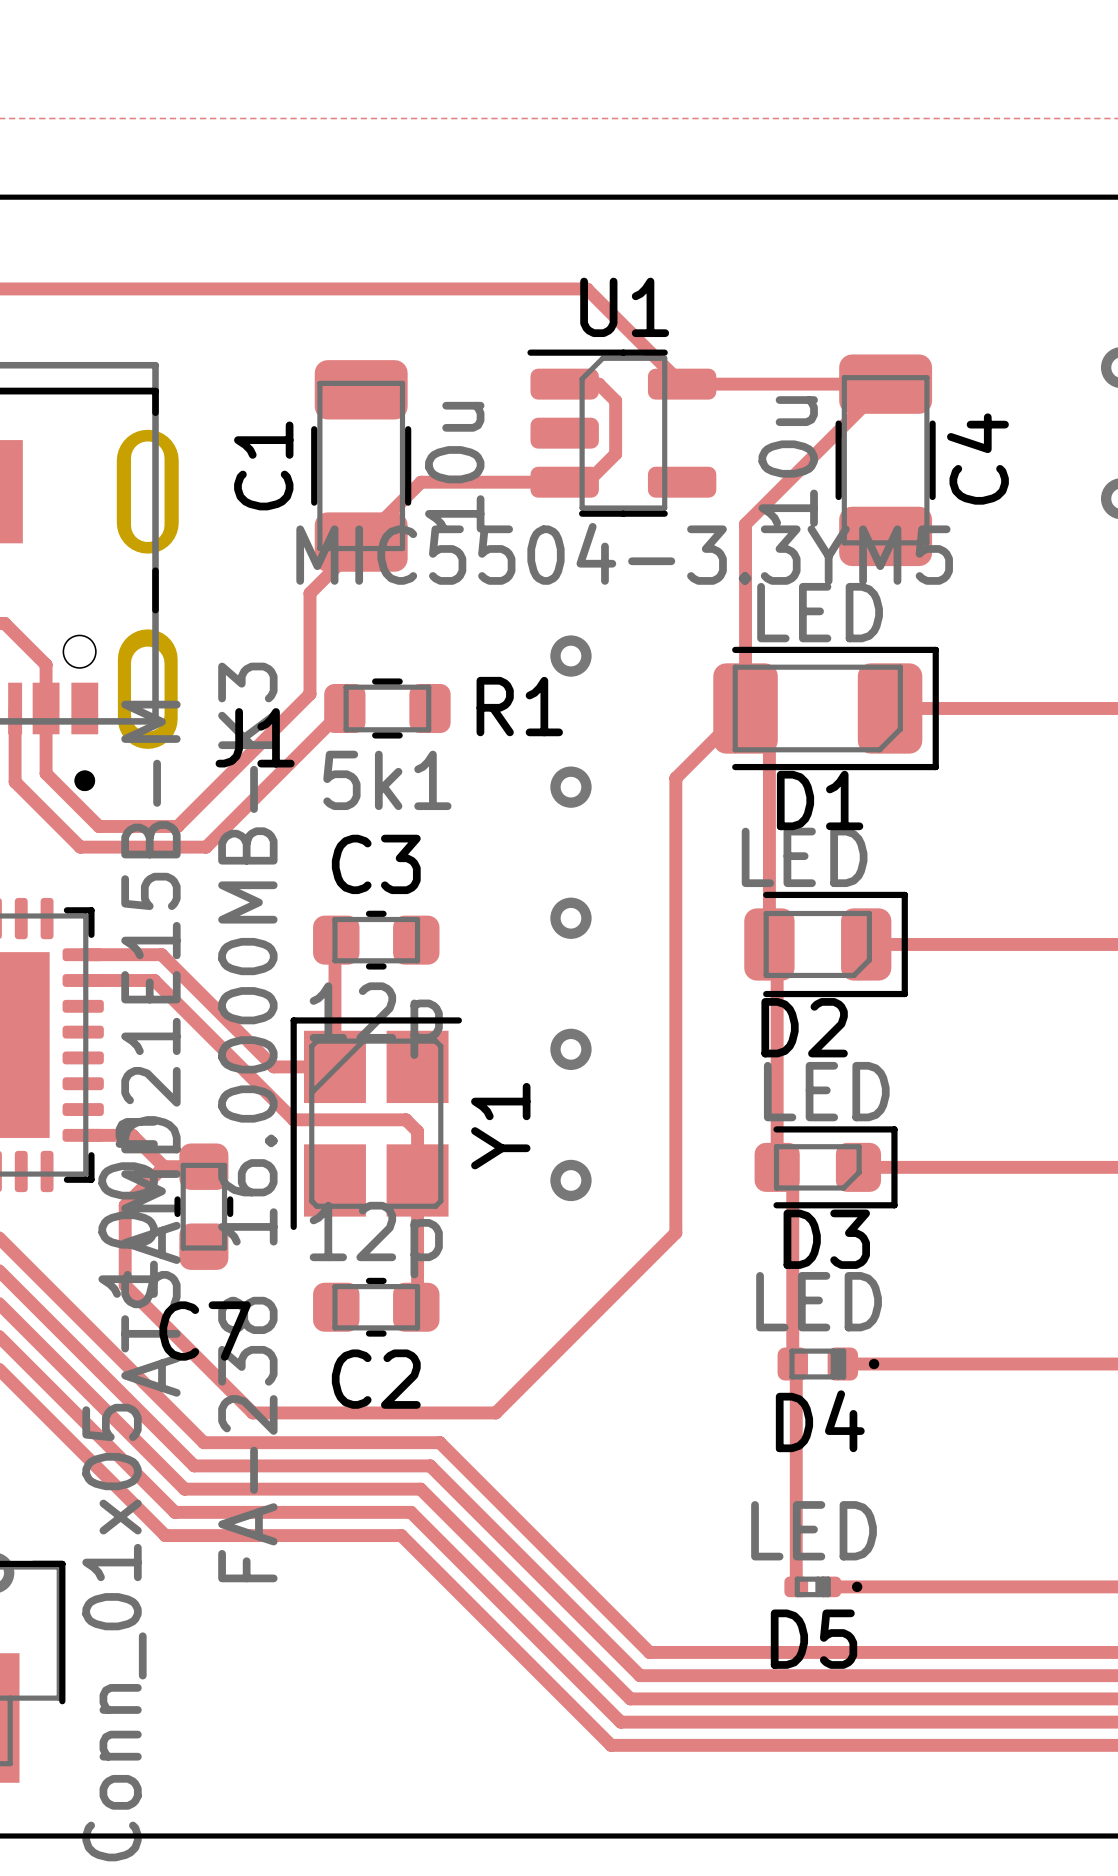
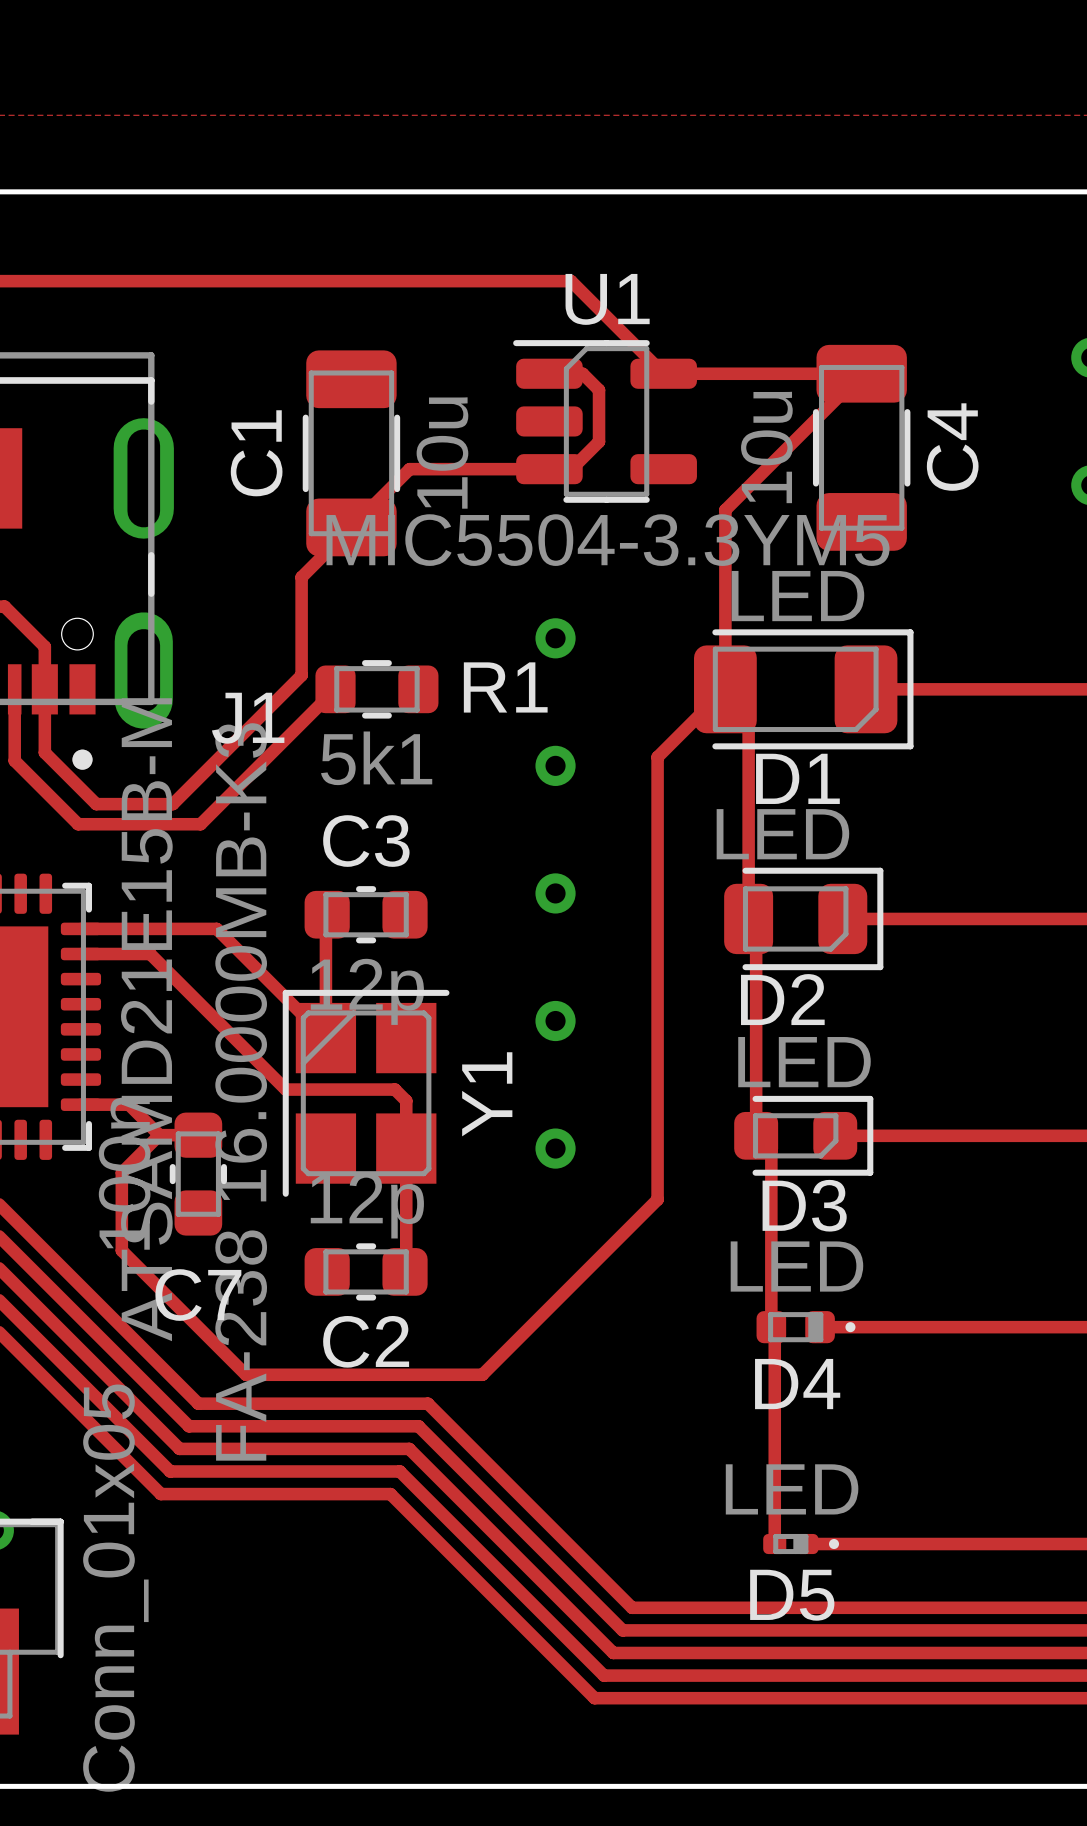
track: (161, 954) (273, 1066) (334, 1066) -> (157, 928) (216, 928) (325, 1038)

